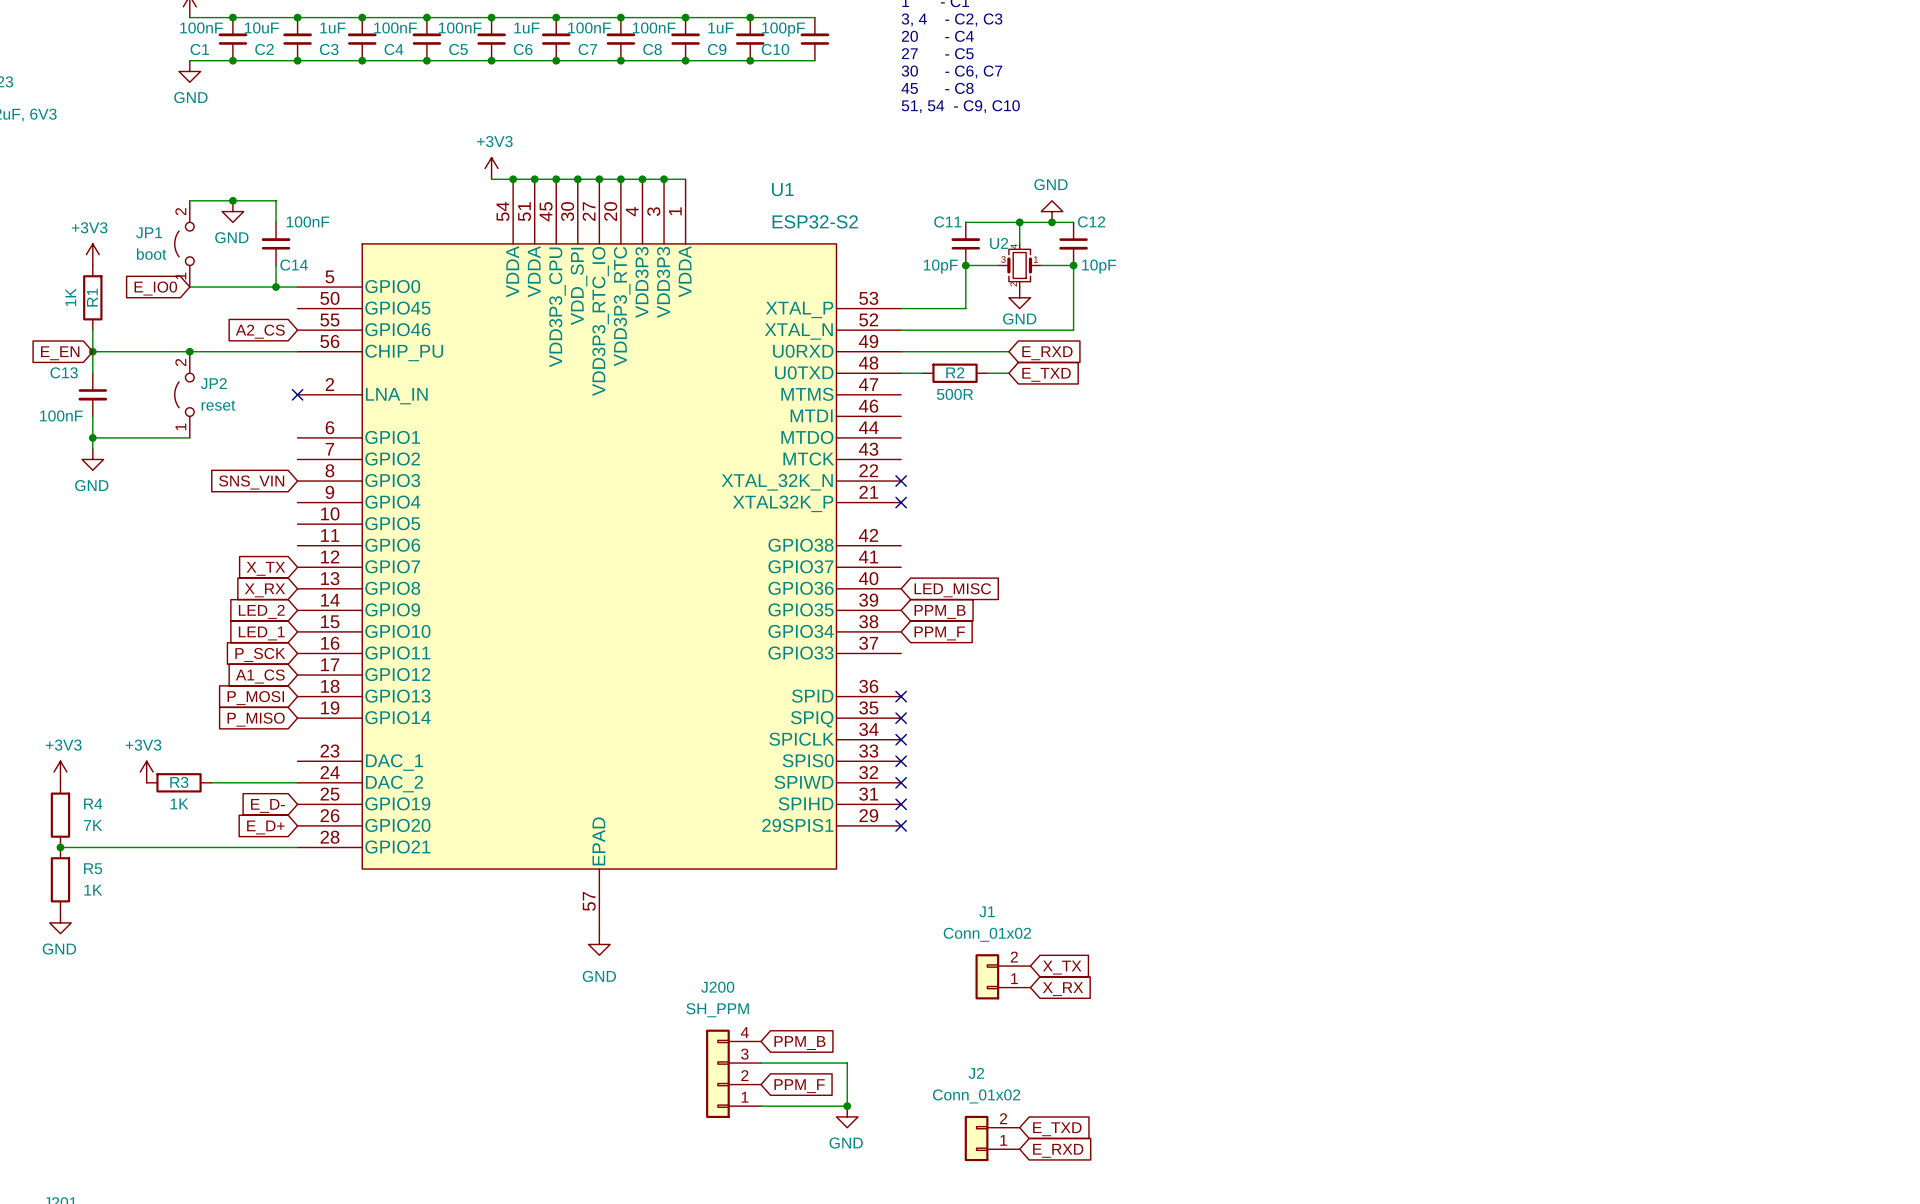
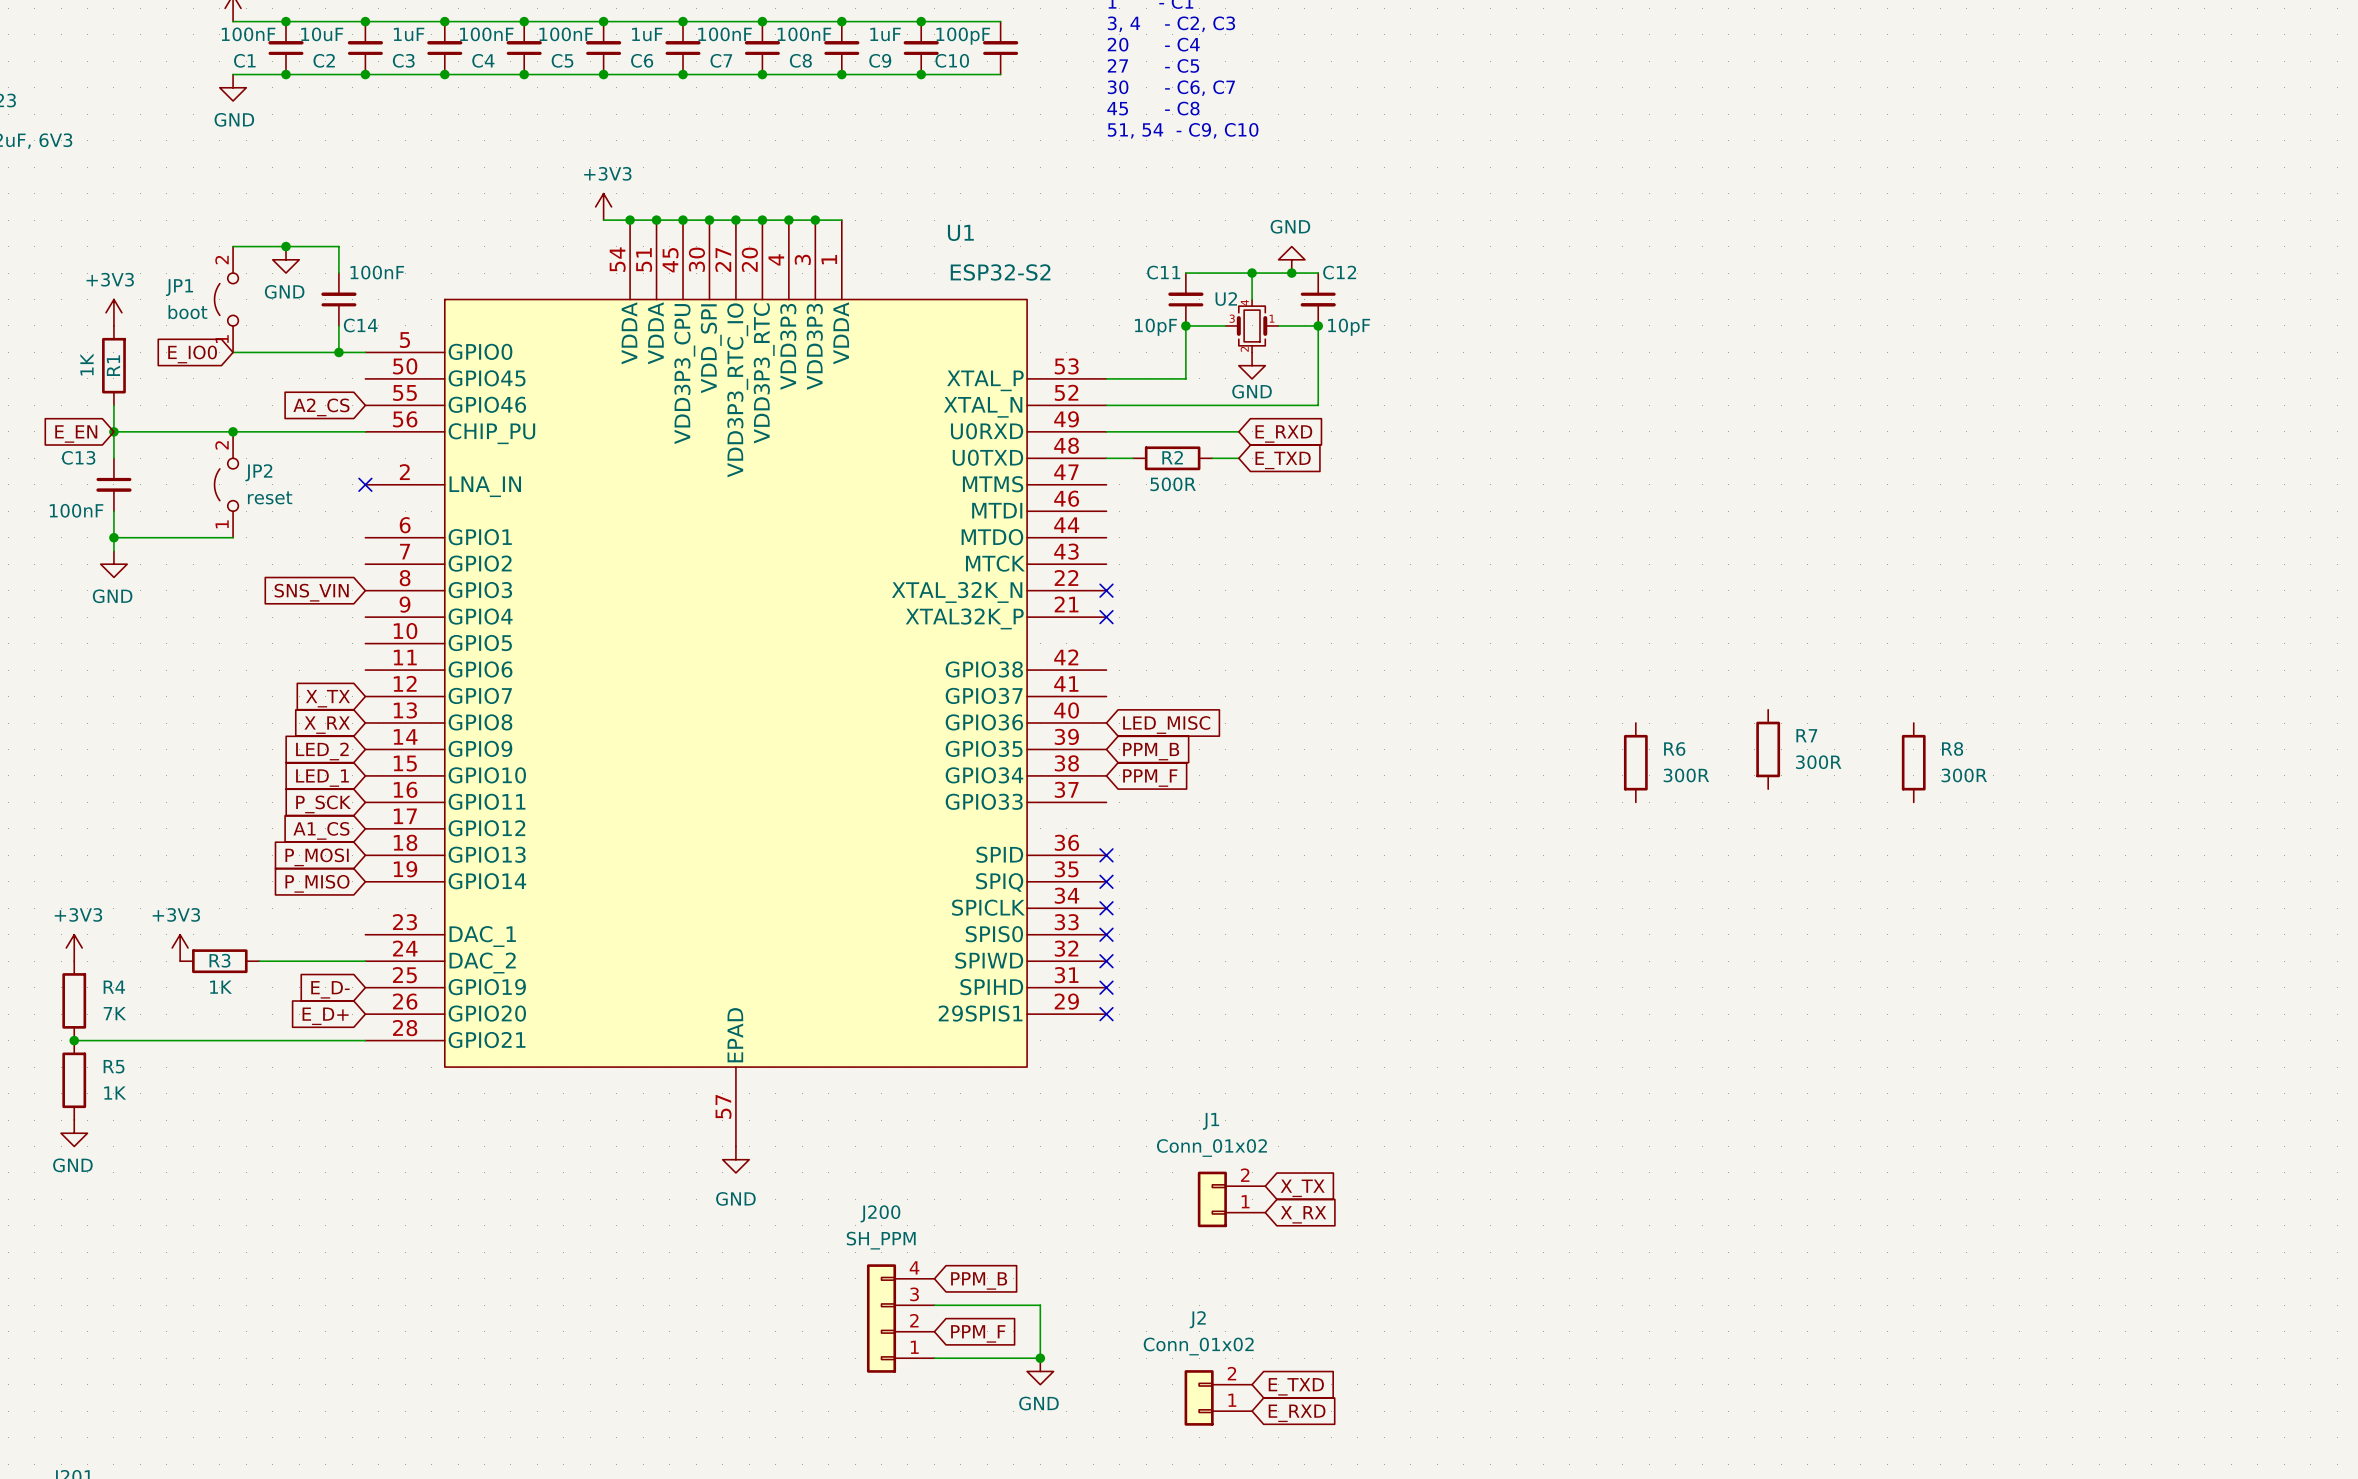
R7: none -> 300R (1768, 749)
R6: none -> 300R (1635, 762)
R8: none -> 300R (1913, 762)

